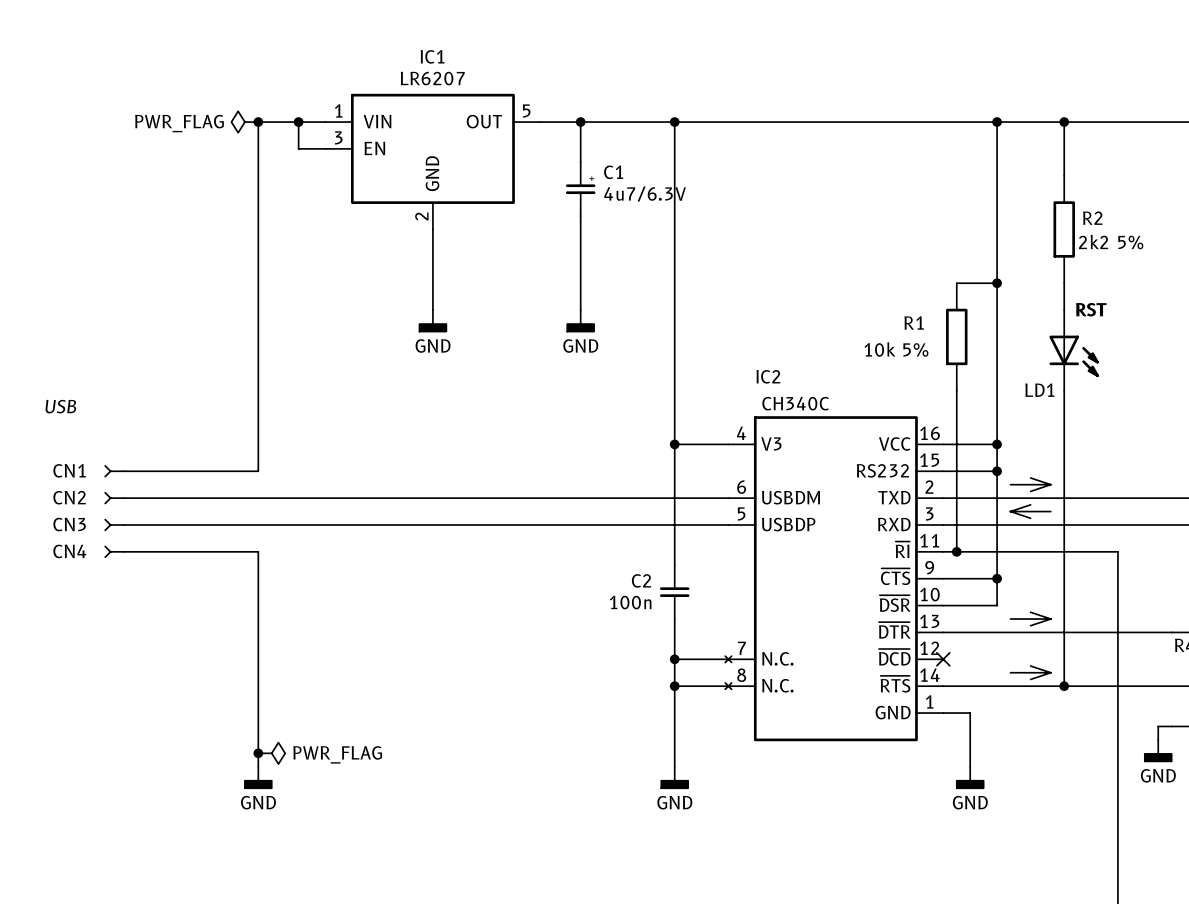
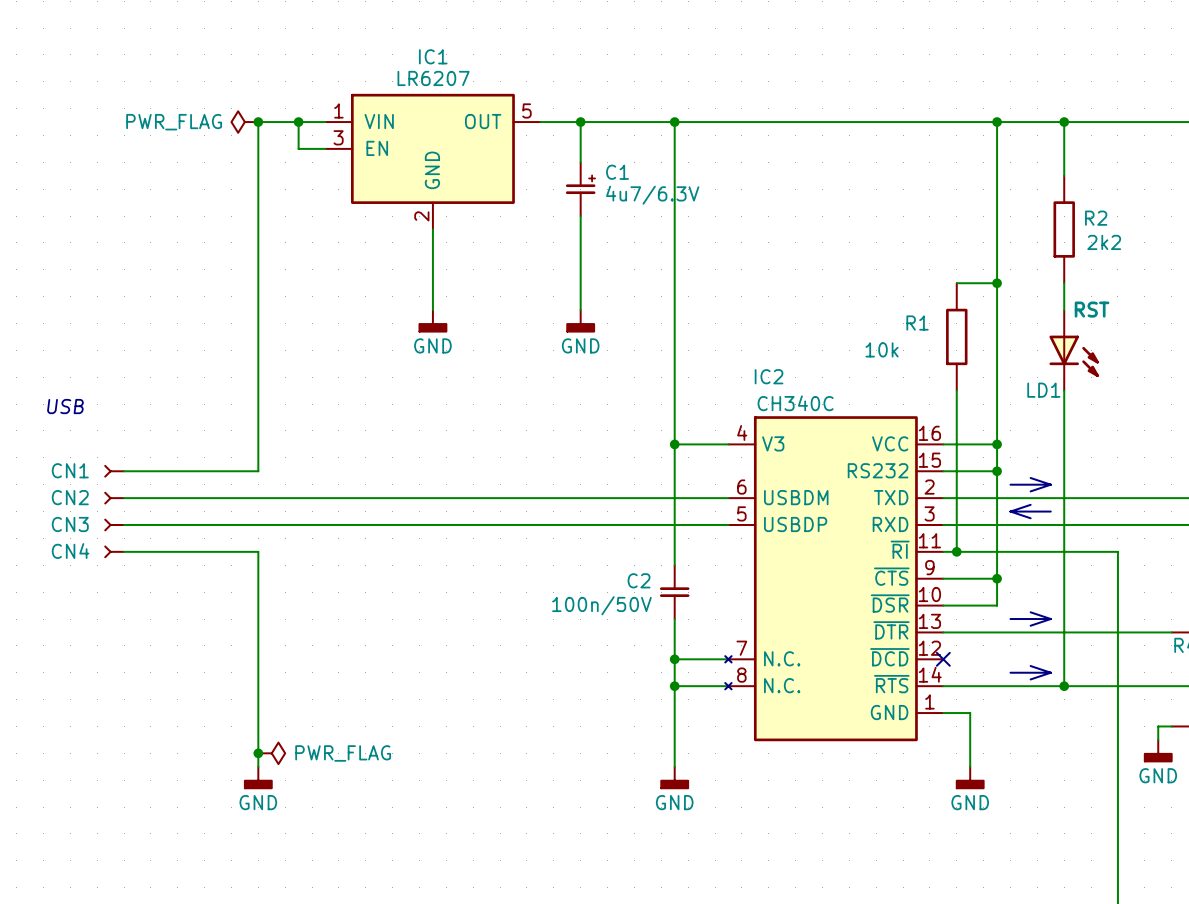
R2 value: 2k2 5% (1111, 242) -> 2k2 (1104, 242)
R1 value: 10k 5% (896, 349) -> 10k (882, 349)
C2 value: 100n (630, 602) -> 100n/50V (601, 605)

